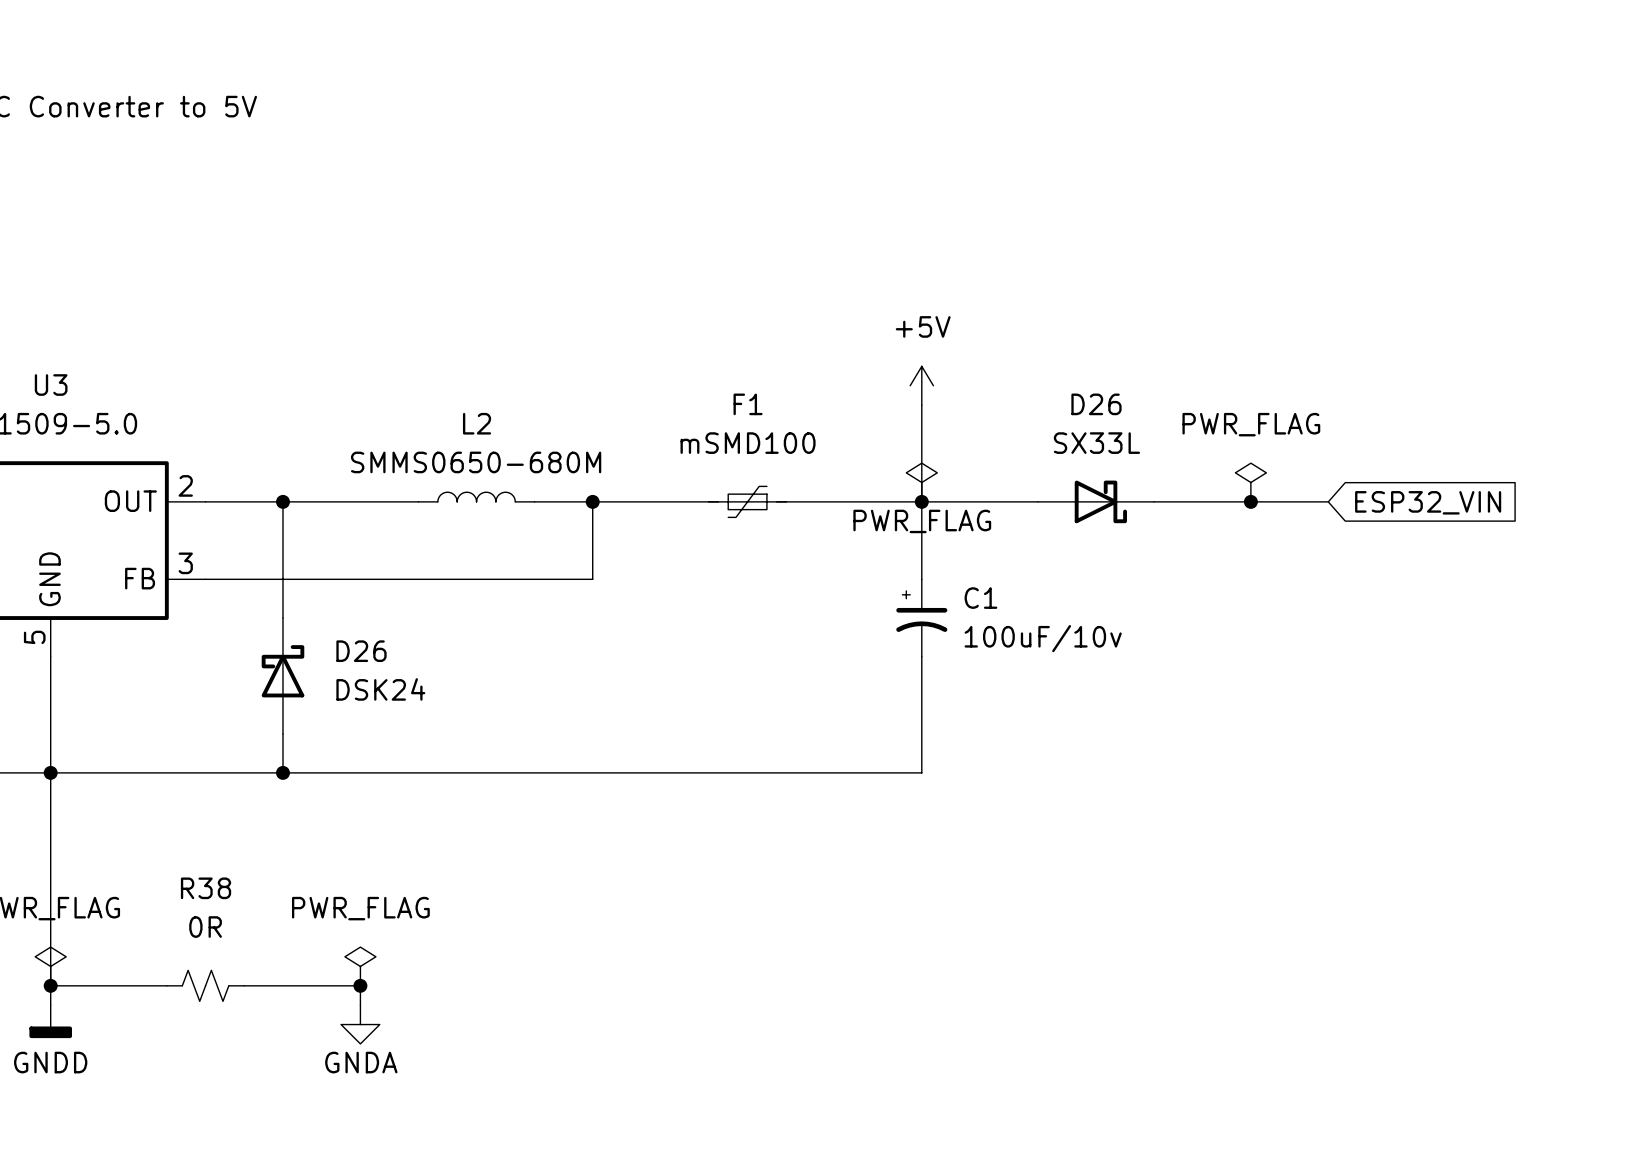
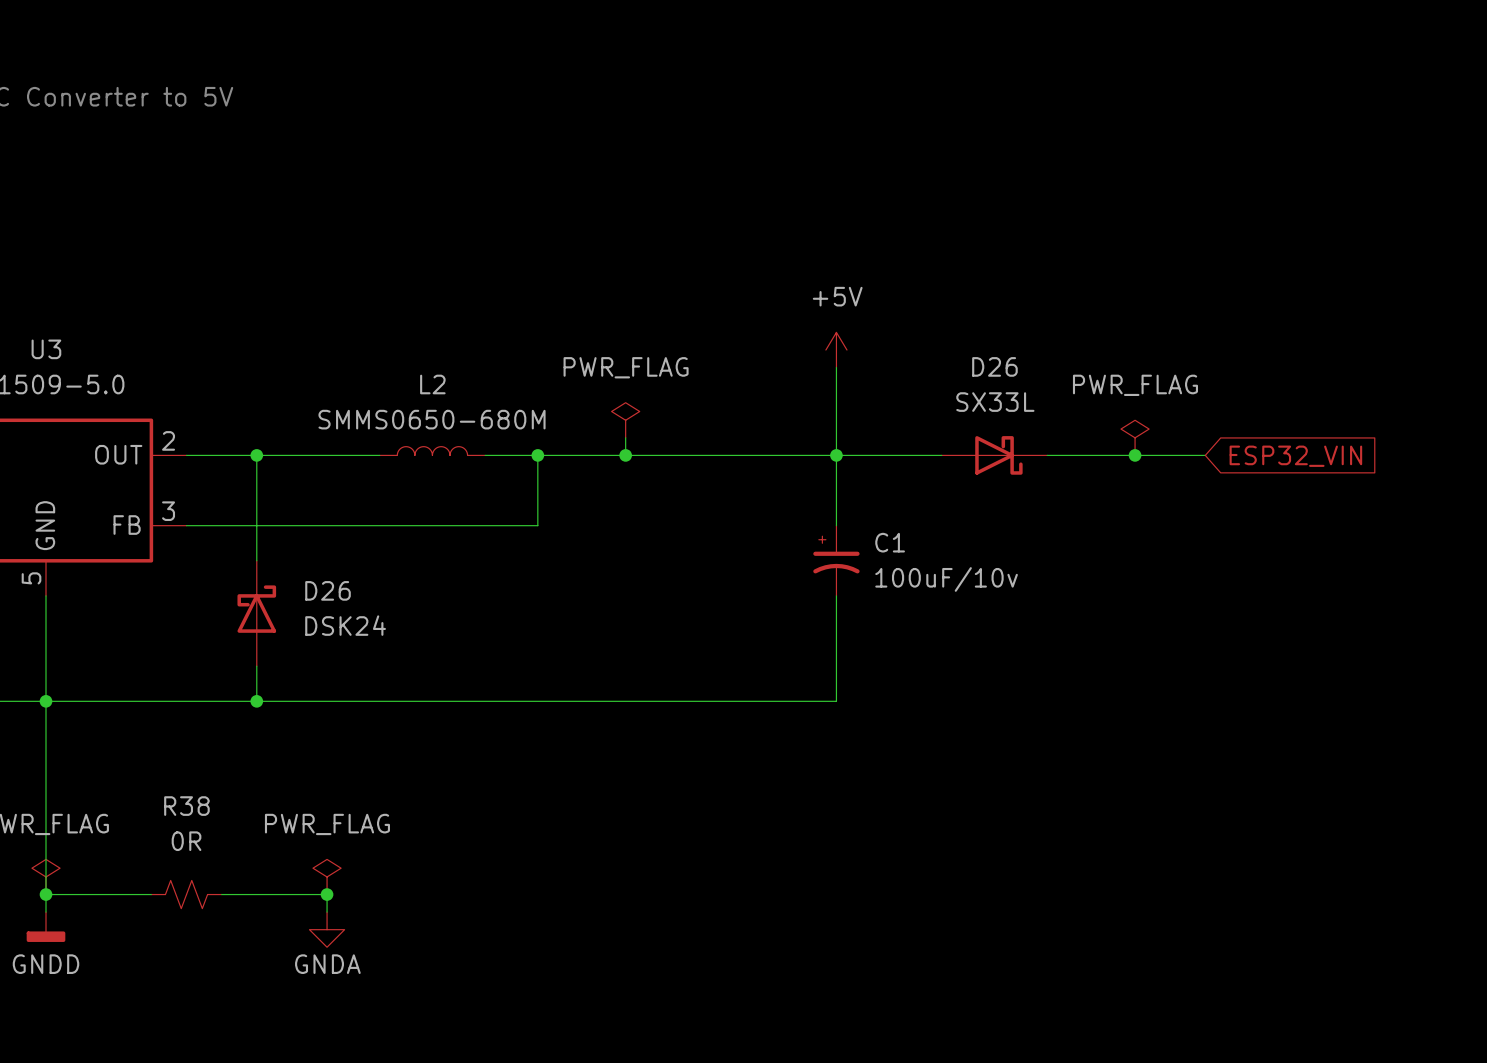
wire: none -> (625, 437) (625, 455)
power symbol position: PWR_FLAG (921, 482) -> PWR_FLAG (625, 420)
junction: none -> (625, 455)
F1: mSMD100 (747, 501) -> none
power symbol text position: PWR_FLAG (922, 521) -> PWR_FLAG (626, 367)

